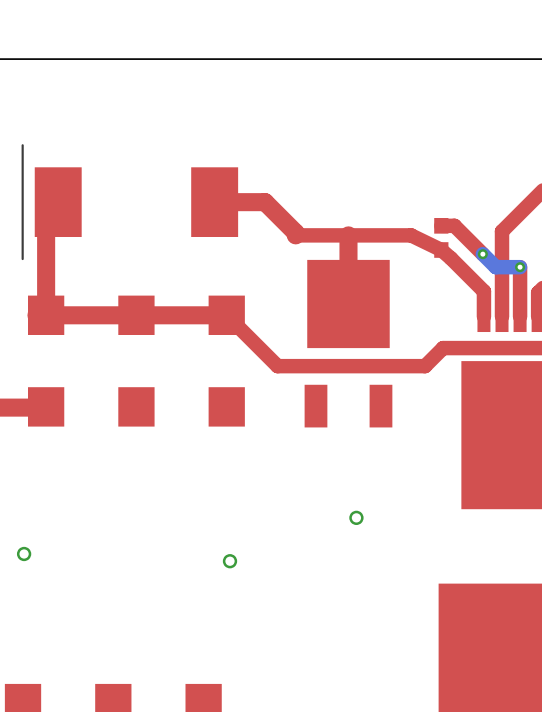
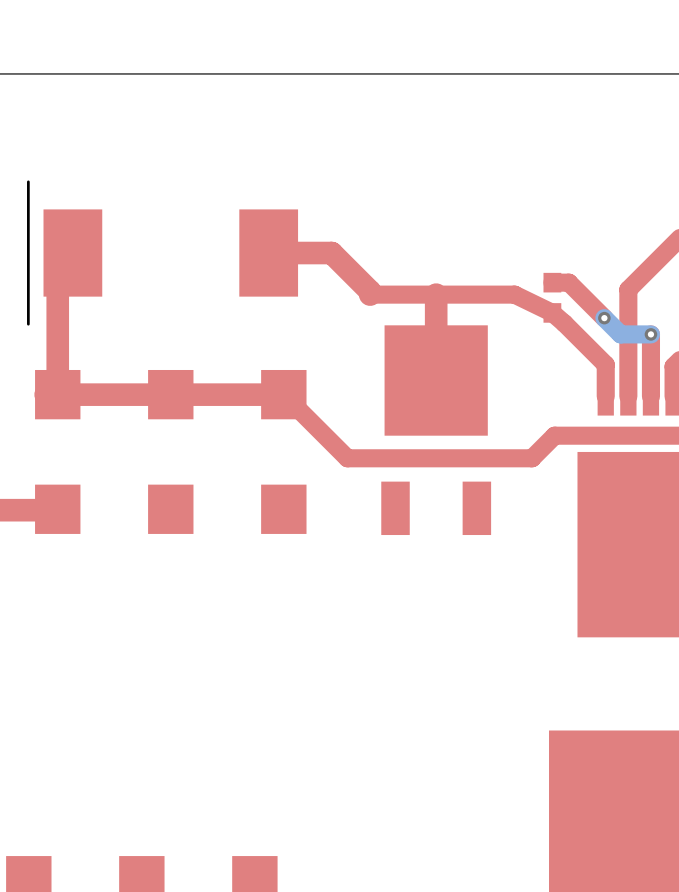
via: (356, 517) -> none
via: (24, 553) -> none
via: (230, 561) -> none

